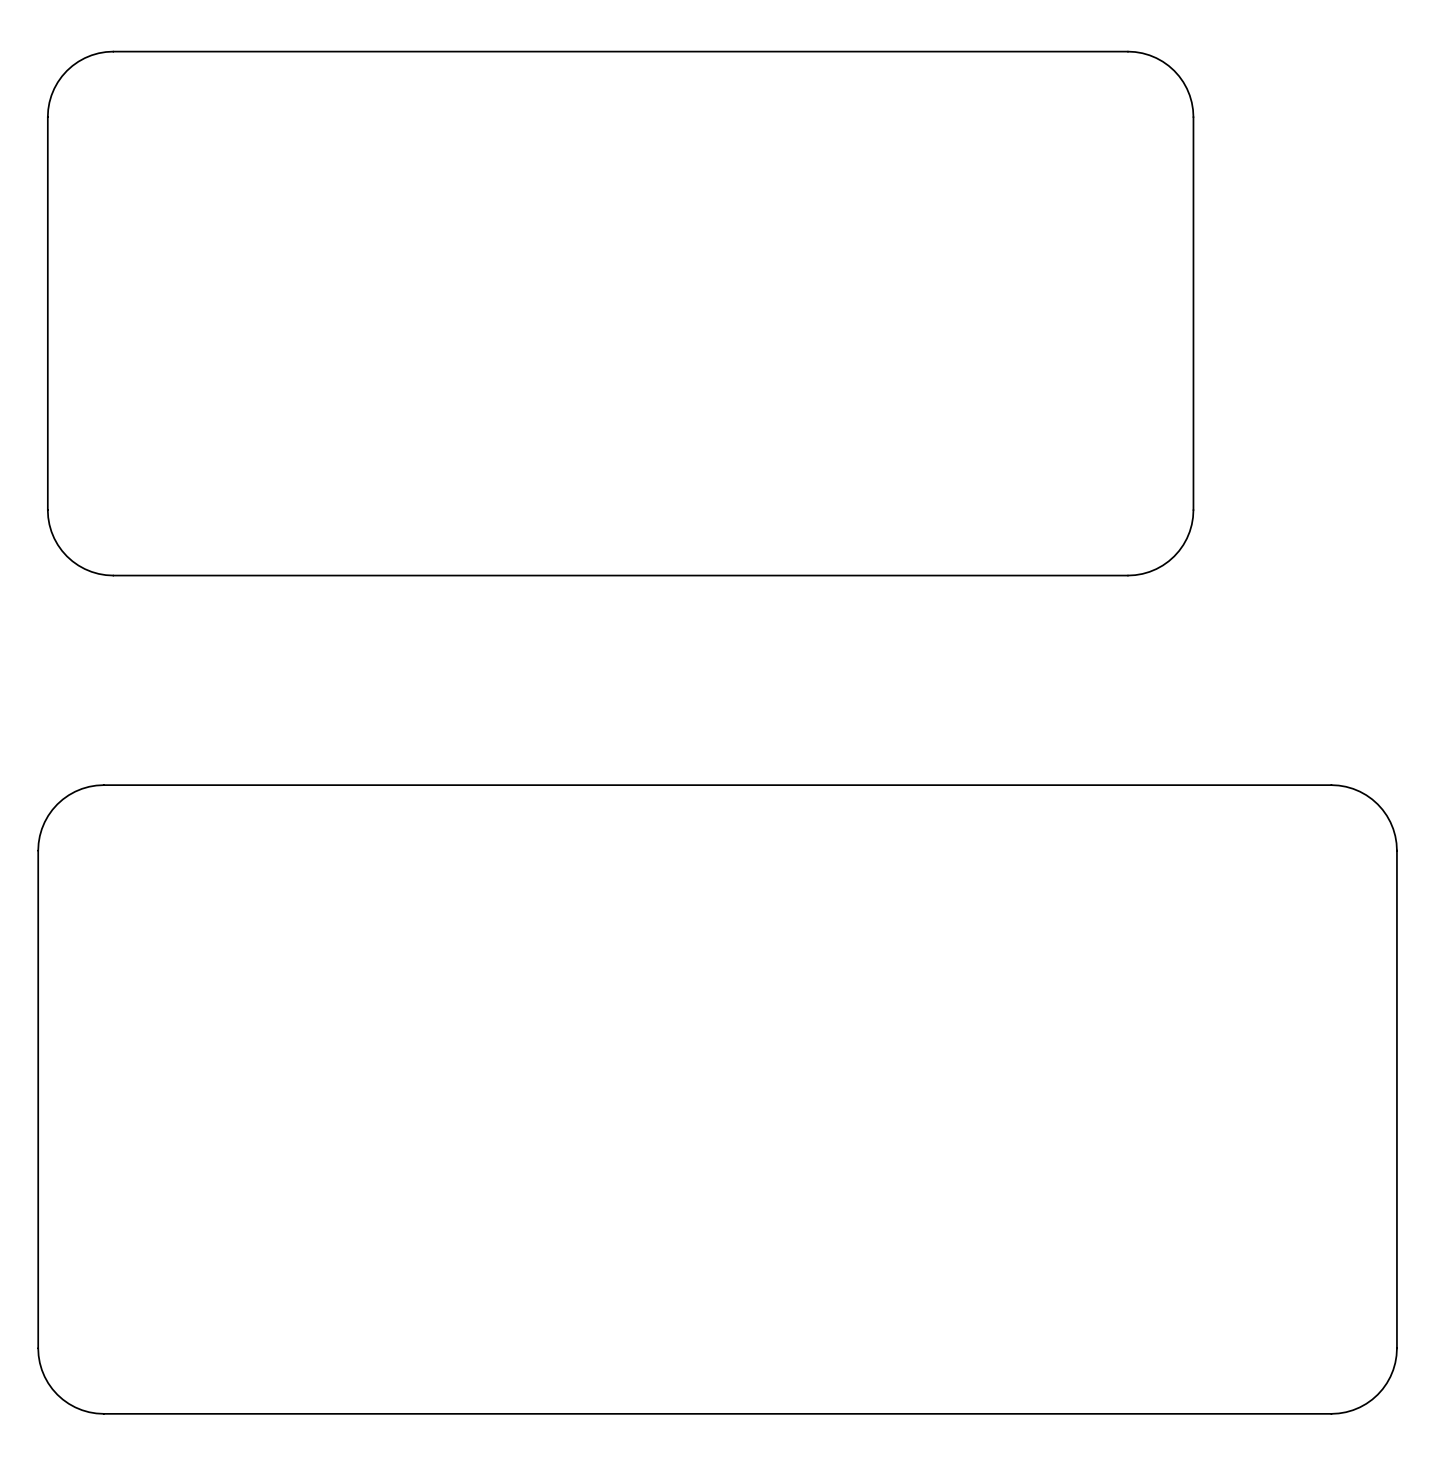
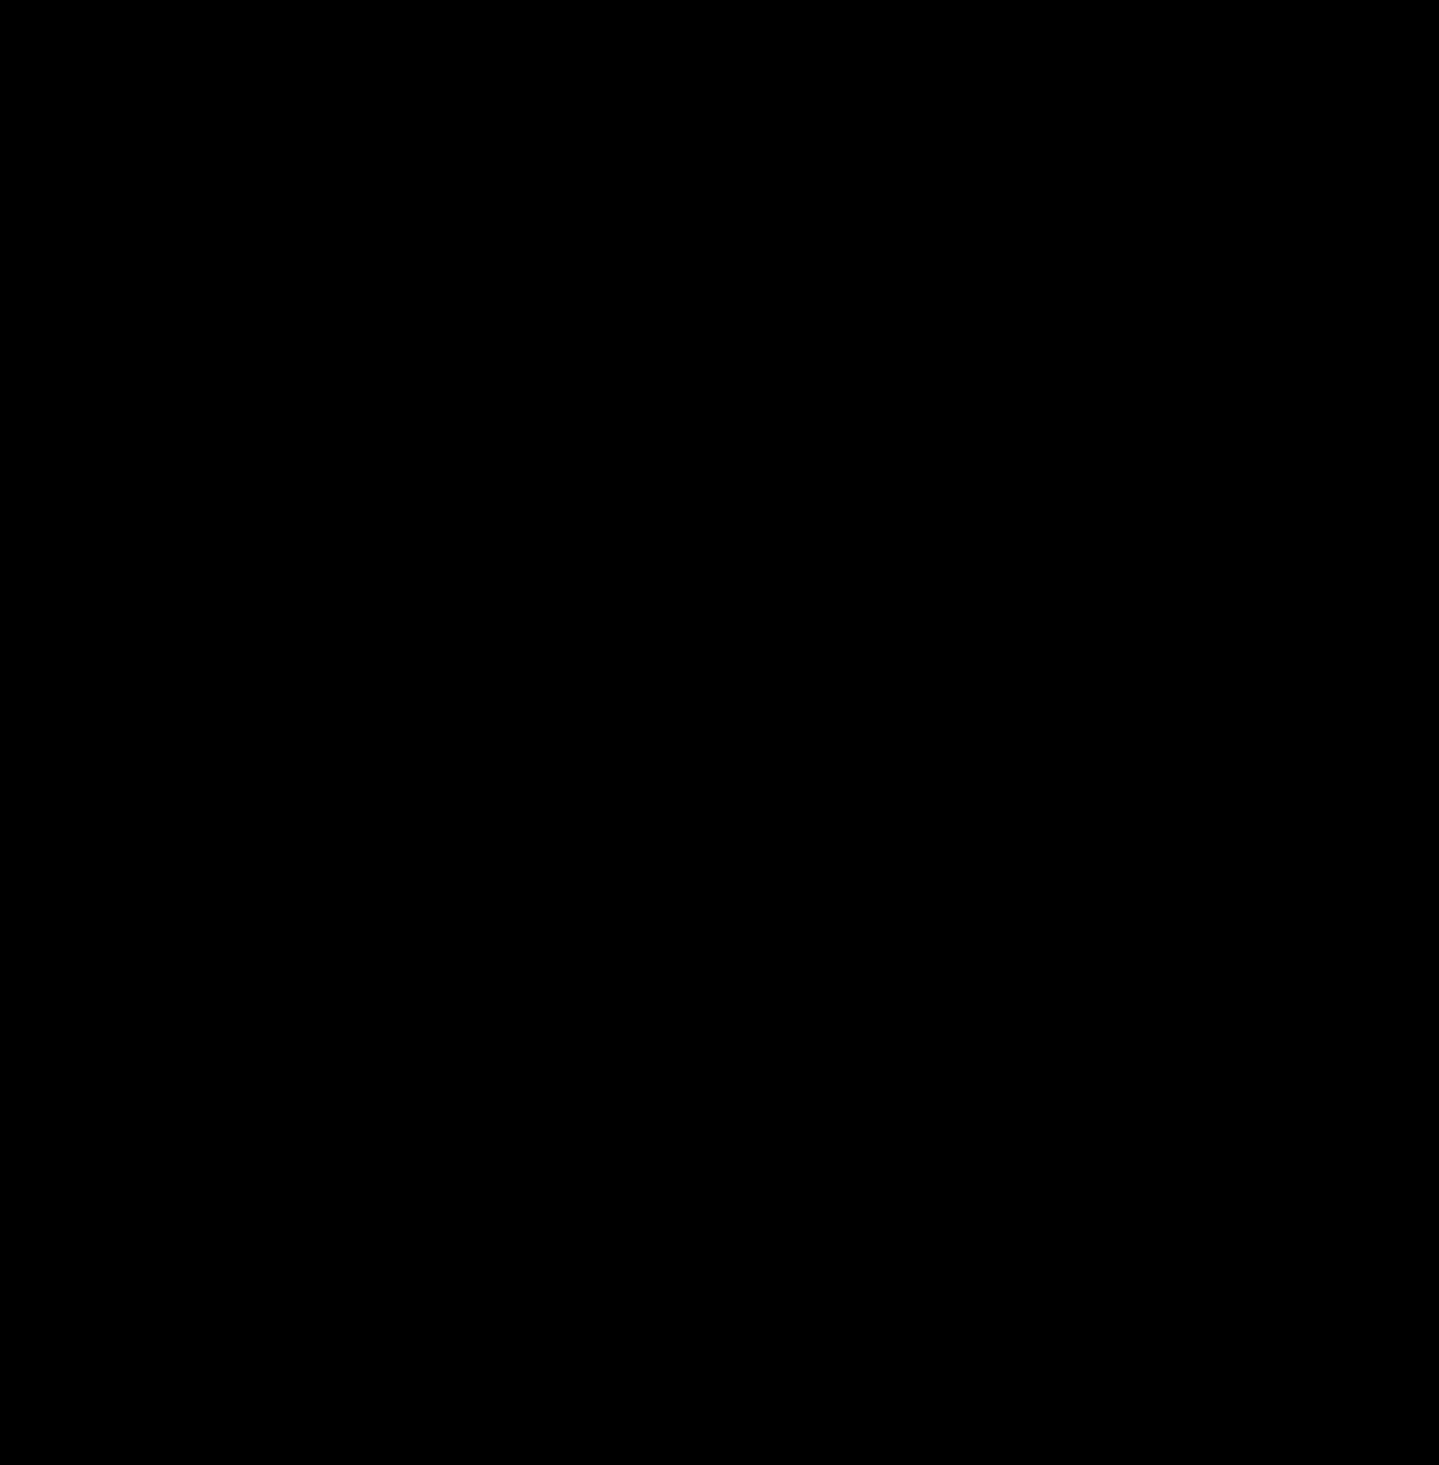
board edge: (113, 51) (1127, 51) (1142, 53) (1156, 58) (1168, 65) (1179, 76) (1189, 95) (1193, 109) (1193, 510) (1191, 524) (1186, 538) (1179, 550) (1162, 565) (1149, 571) (1127, 575) (113, 575) (98, 573) (84, 569) (72, 561) (62, 550) (51, 531) (48, 517) (47, 117) (49, 102) (54, 88) (66, 70) (78, 61) (91, 55) (113, 51) -> none
board edge: (103, 785) (1331, 785) (1346, 786) (1359, 791) (1377, 804) (1386, 815) (1395, 836) (1396, 850) (1396, 1348) (1395, 1362) (1390, 1376) (1377, 1394) (1366, 1403) (1353, 1410) (1331, 1413) (103, 1413) (89, 1412) (75, 1407) (62, 1399) (52, 1389) (44, 1376) (38, 1355) (38, 850) (41, 828) (48, 815) (57, 804) (68, 795) (82, 788) (103, 785) -> none

